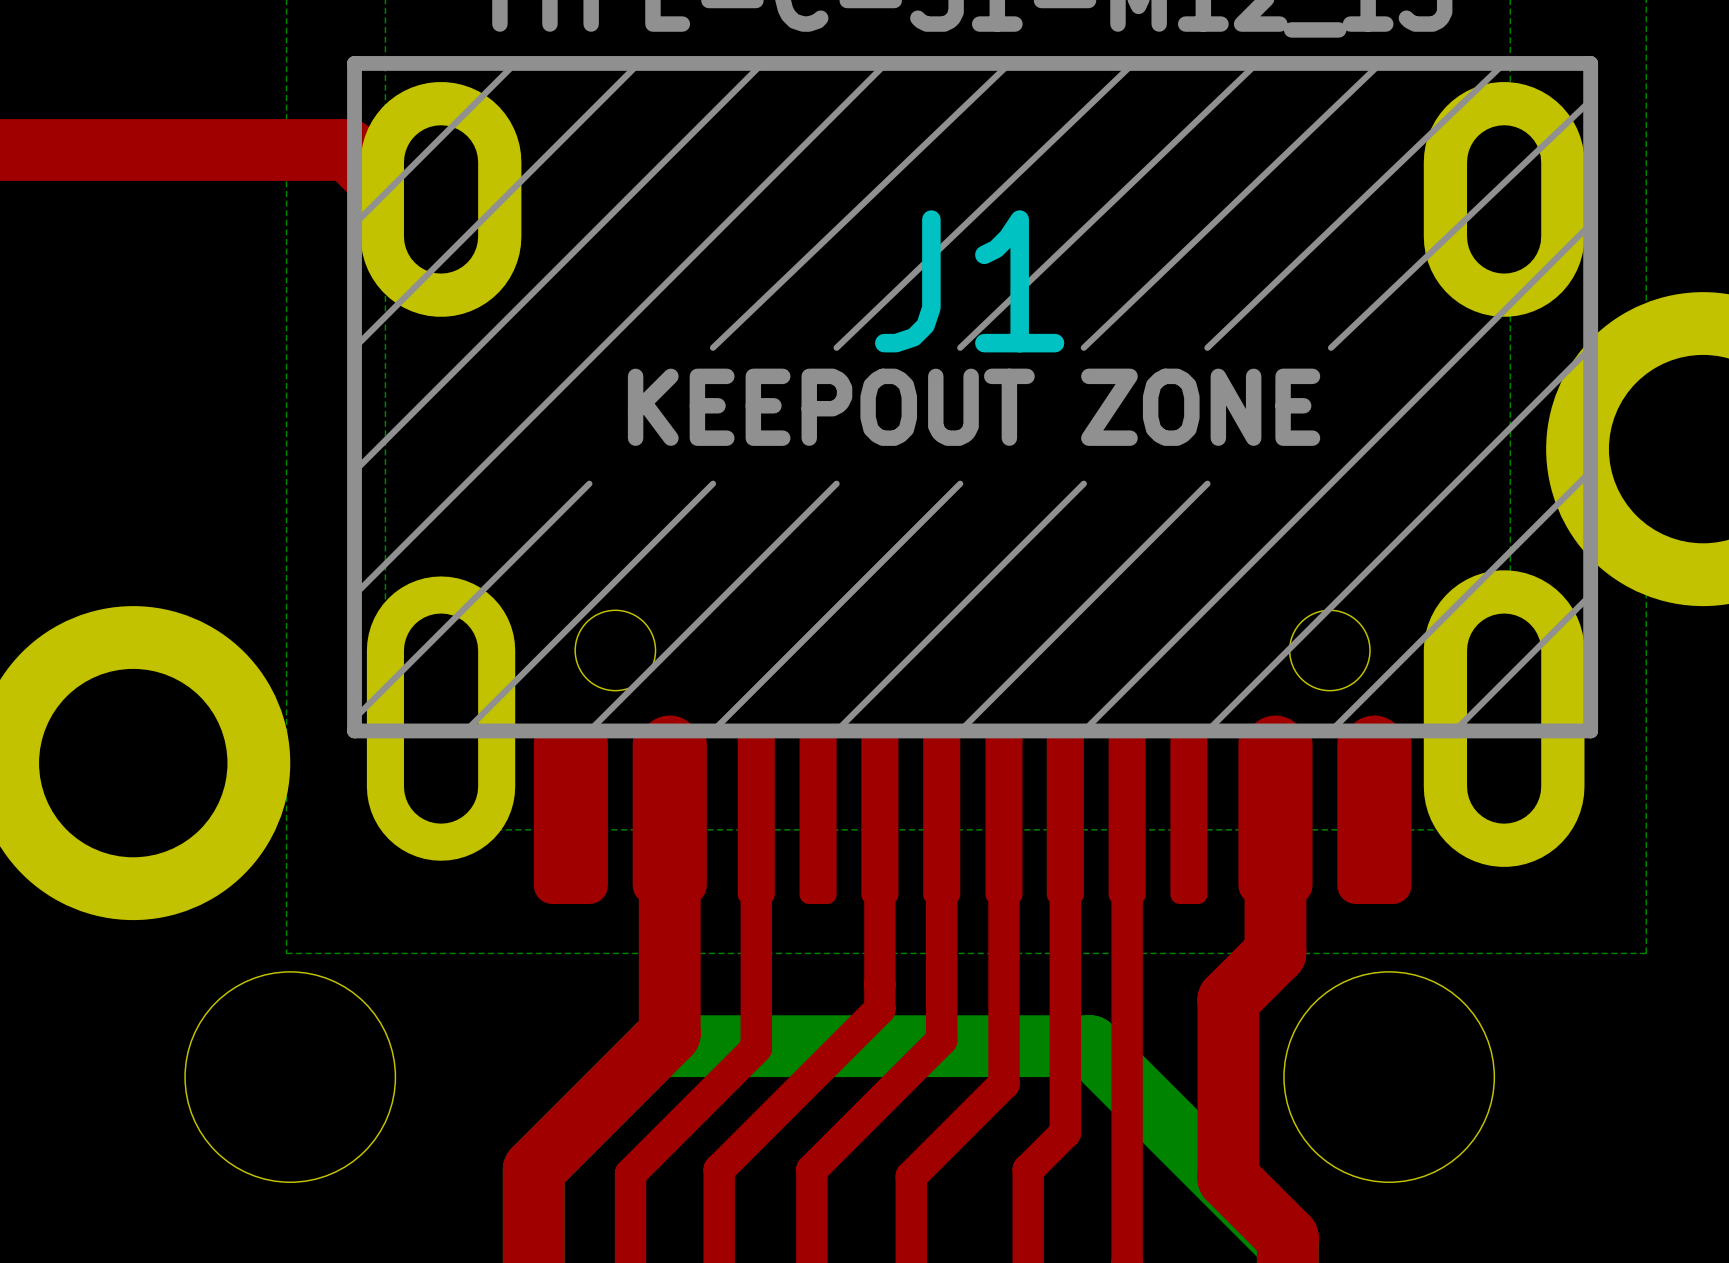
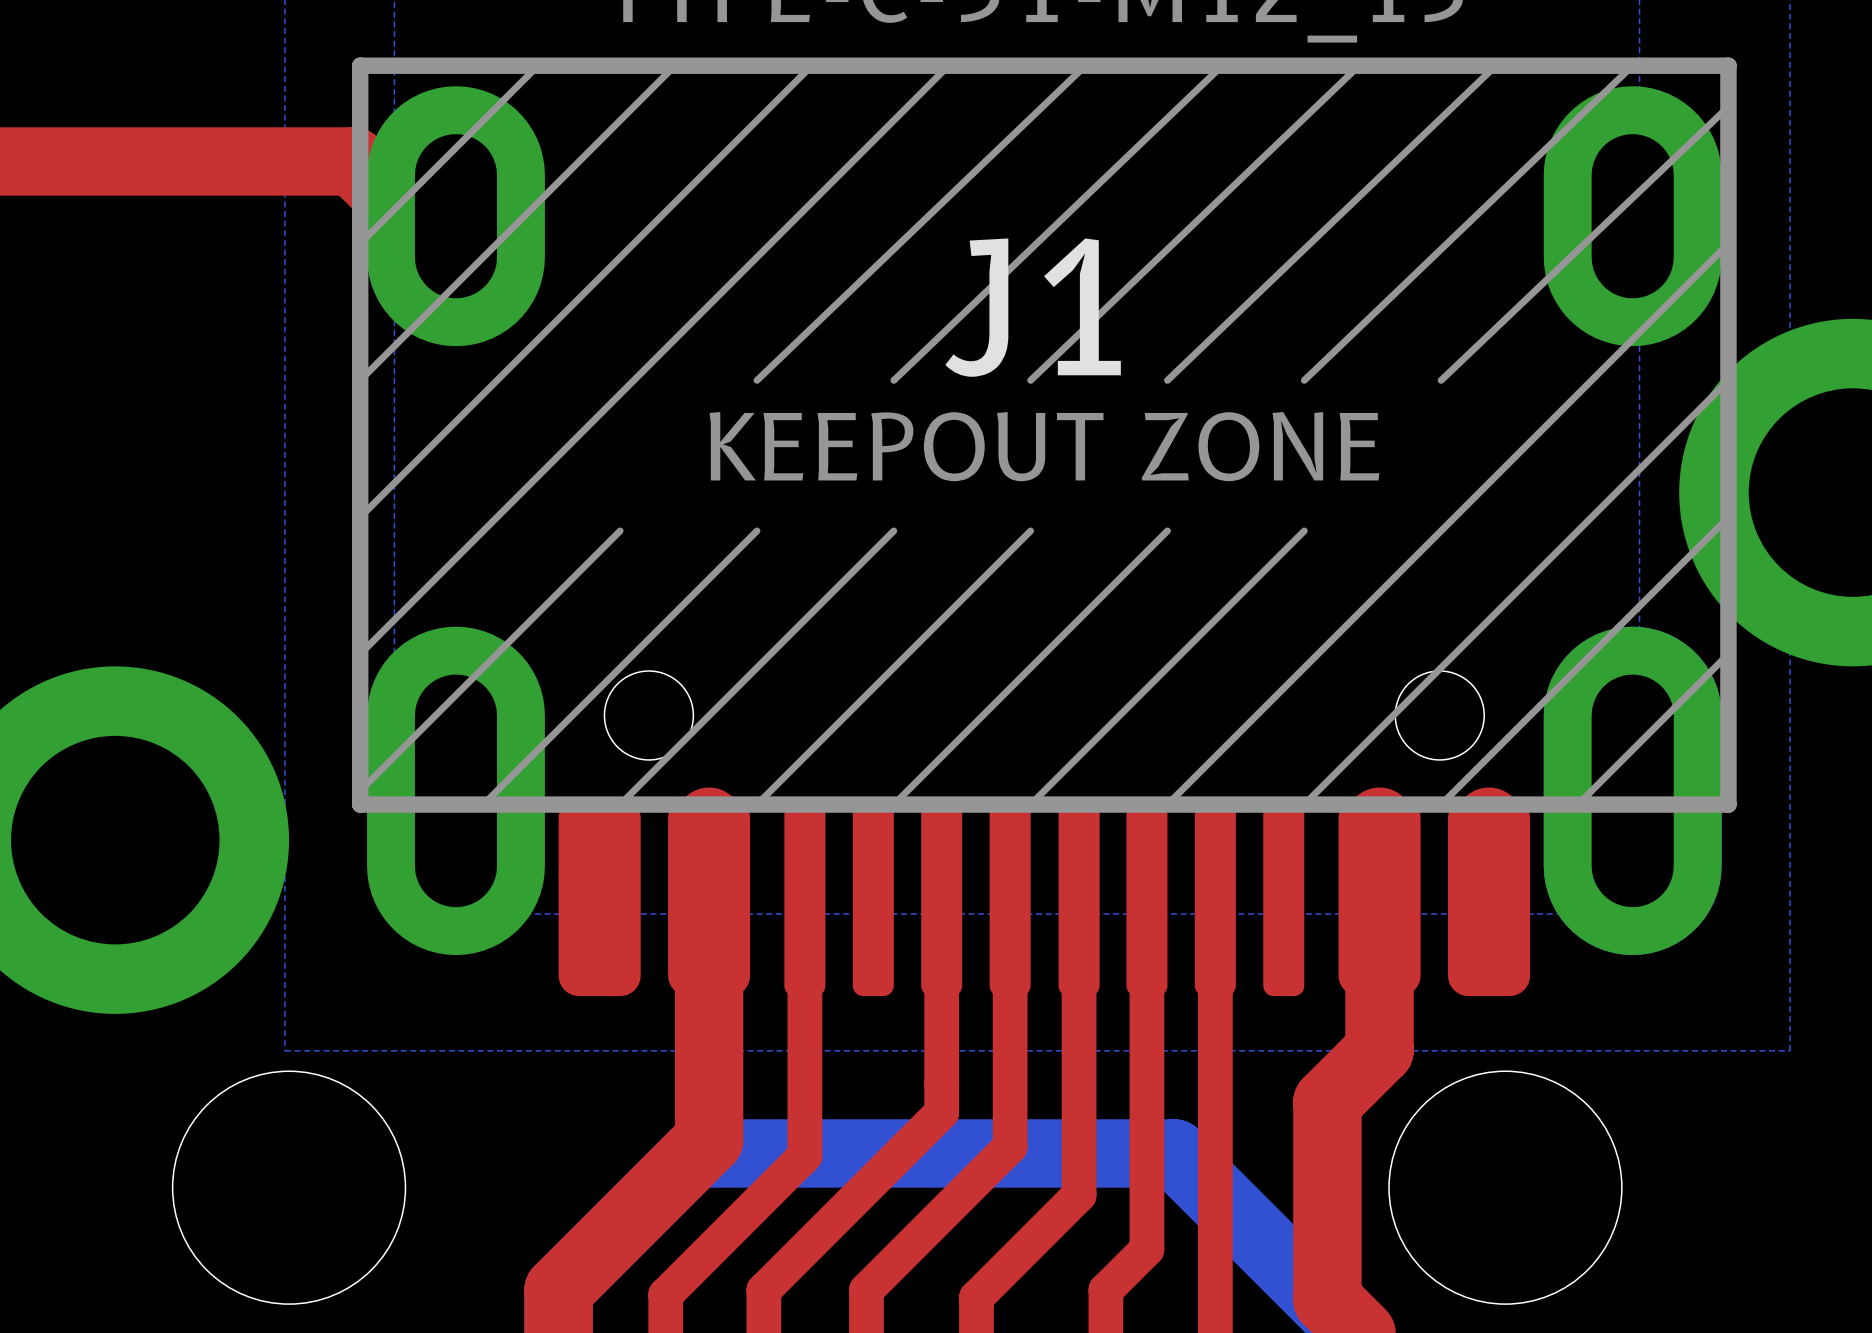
J1 footprint: [347, 56, 1599, 905] -> [351, 57, 1737, 997]

